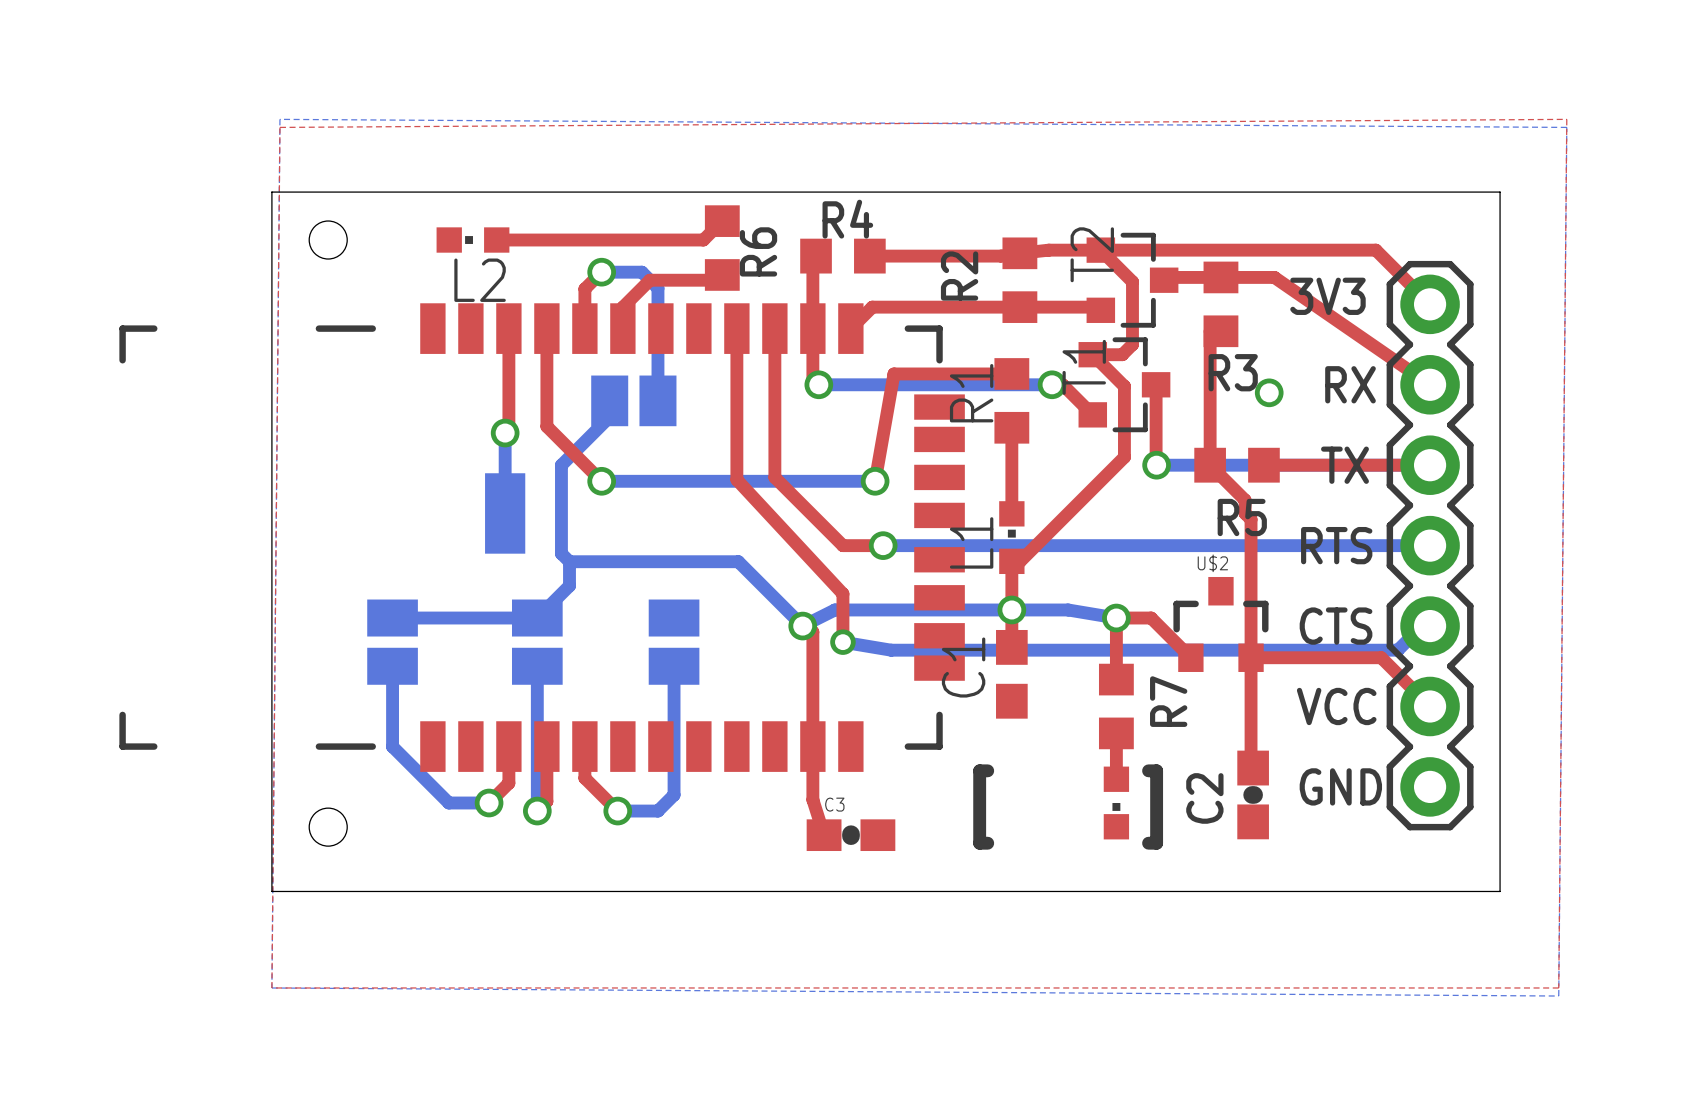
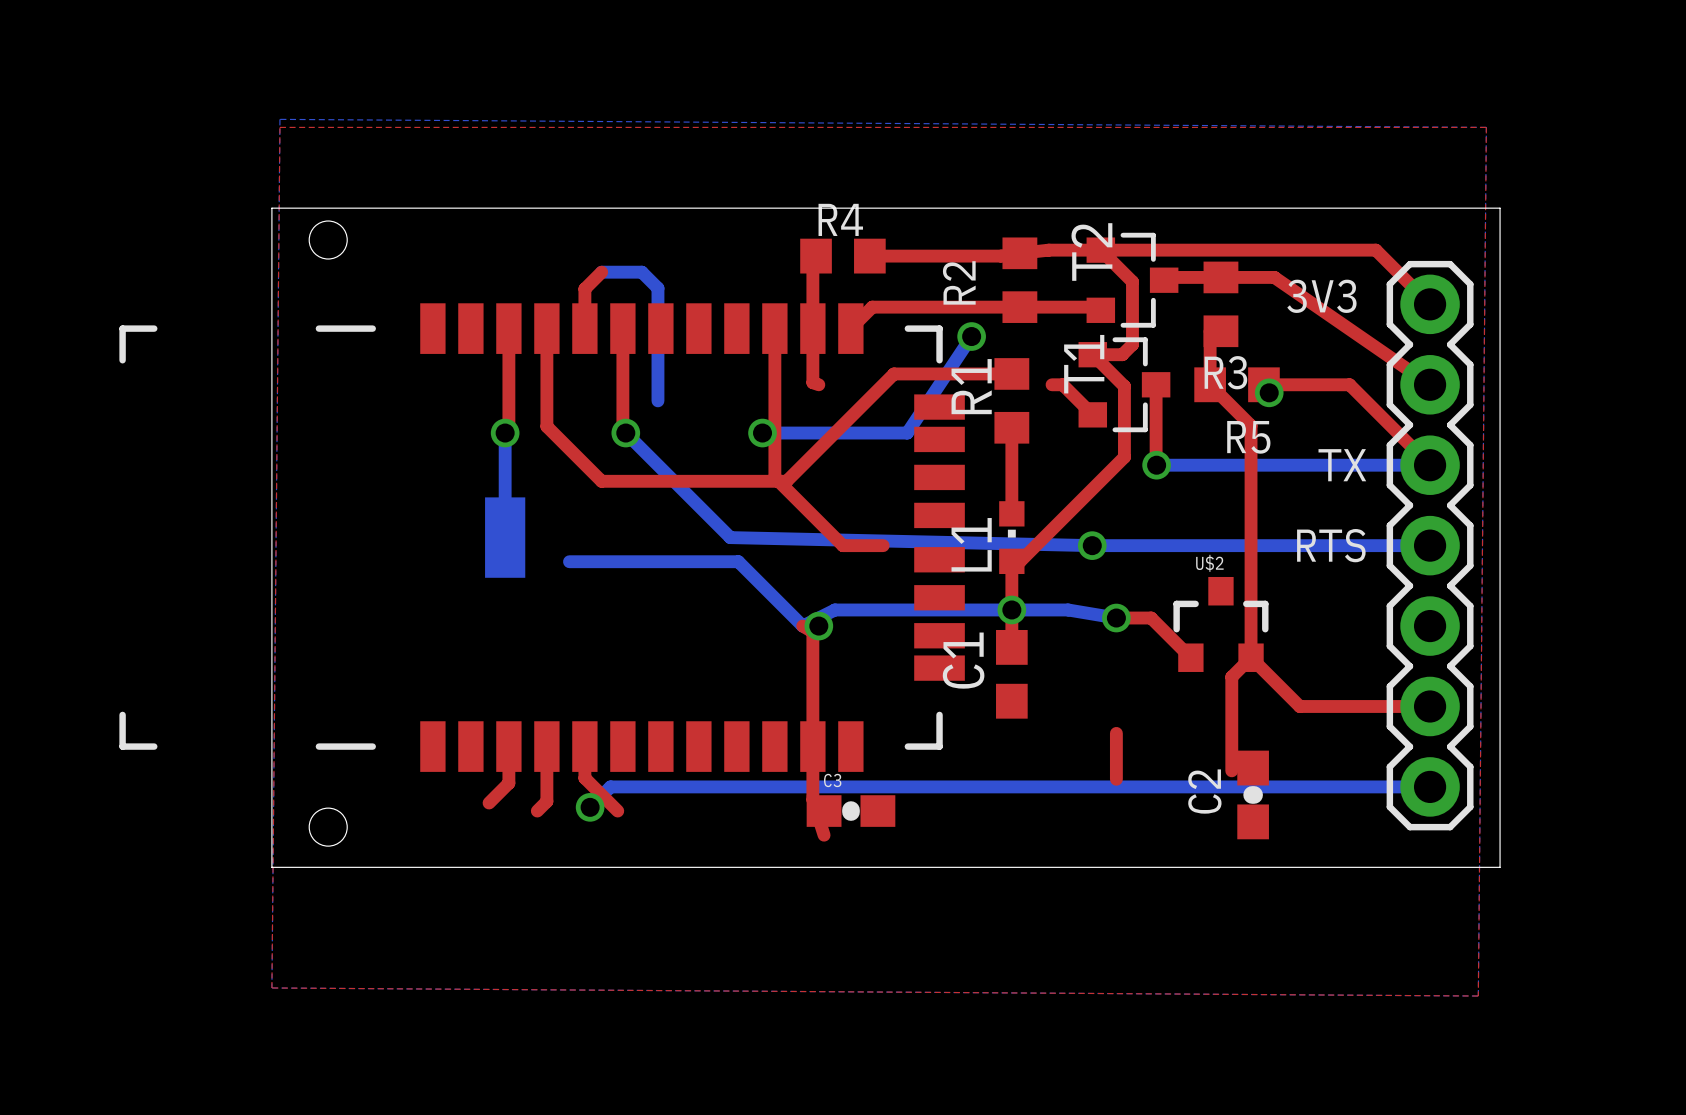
bottom zone outline: (279, 119) (1566, 127) (1558, 996) (271, 987) -> (279, 119) (1486, 127) (1478, 996) (271, 987)
top zone outline: (279, 127) (1566, 119) (1558, 987) (271, 987) -> (279, 127) (1486, 127) (1478, 996) (271, 987)
board edge: (271, 208) (271, 192) (1500, 192) (1500, 208) -> (271, 208) (1500, 208)
top track: (722, 221) (703, 240) (496, 240) -> none
L2: (472, 240) -> none
R6: (722, 248) -> none
via: (601, 272) -> none
top track: (722, 274) (717, 280) (649, 280) (622, 307) (622, 328) -> (625, 433) (622, 430) (622, 328)
top track: (736, 328) (736, 479) (842, 593) (842, 642) -> none
bottom track: none -> (971, 336) (907, 433) (762, 433)
via: none -> (971, 336)
top track: (893, 373) (875, 481) -> (893, 373) (786, 481) (601, 481)
bottom track: (818, 384) (1052, 384) -> none
via: (818, 384) -> none
via: (1052, 384) -> none
top track: (1210, 384) (1210, 465) (1245, 500) (1245, 513) (1251, 519) -> (1210, 384) (1251, 425) (1251, 519)
text: RX (1350, 384) -> none
bottom track: (609, 400) (609, 416) (561, 465) (561, 553) (569, 561) (569, 585) (537, 618) (392, 618) -> none
part: (633, 400) -> none
via: none -> (762, 433)
R5 position: (1237, 465) -> (1237, 384)
top track: (1263, 465) (1430, 465) -> (1263, 384) (1349, 384) (1430, 465)
bottom track: (601, 481) (875, 481) -> none
via position: (601, 481) -> (625, 433)
via: (875, 481) -> none
part position: (505, 513) -> (505, 537)
bottom track: (883, 545) (1092, 545) -> (625, 433) (730, 537) (1092, 545)
via: (883, 545) -> none
via: none -> (1092, 545)
top track: (1116, 618) (1116, 679) -> none
via position: (802, 626) -> (818, 626)
text: CTS (1336, 626) -> none
bottom track: (1430, 626) (1422, 626) (1397, 650) (891, 650) (842, 642) -> none
part: (392, 642) -> none
part: (537, 642) -> none
part: (674, 642) -> none
via: (842, 642) -> none
bottom track: (392, 666) (392, 746) (448, 803) (489, 803) -> none
bottom track: (537, 666) (537, 811) -> none
bottom track: (674, 666) (674, 794) (657, 811) (617, 811) -> none
R7: (1116, 706) -> none
text: VCC (1336, 706) -> none
top track: (1430, 706) (1381, 657) (1251, 657) (1251, 765) (1253, 768) -> (1430, 706) (1299, 706) (1251, 657) (1231, 676) (1231, 770)
line: (987, 770) (979, 770) (979, 843) (987, 843) -> none
line: (1148, 770) (1156, 770) (1156, 843) (1148, 843) -> none
text: GND (1340, 786) -> none
bottom track: none -> (1430, 786) (610, 786) (590, 807)
via: (489, 803) -> none
part: (1116, 803) -> none
via: (537, 811) -> none
via position: (617, 811) -> (590, 807)
C3 position: (850, 835) -> (850, 811)
board edge: (271, 867) (271, 891) (1500, 891) (1500, 867) -> (271, 867) (1500, 867)

